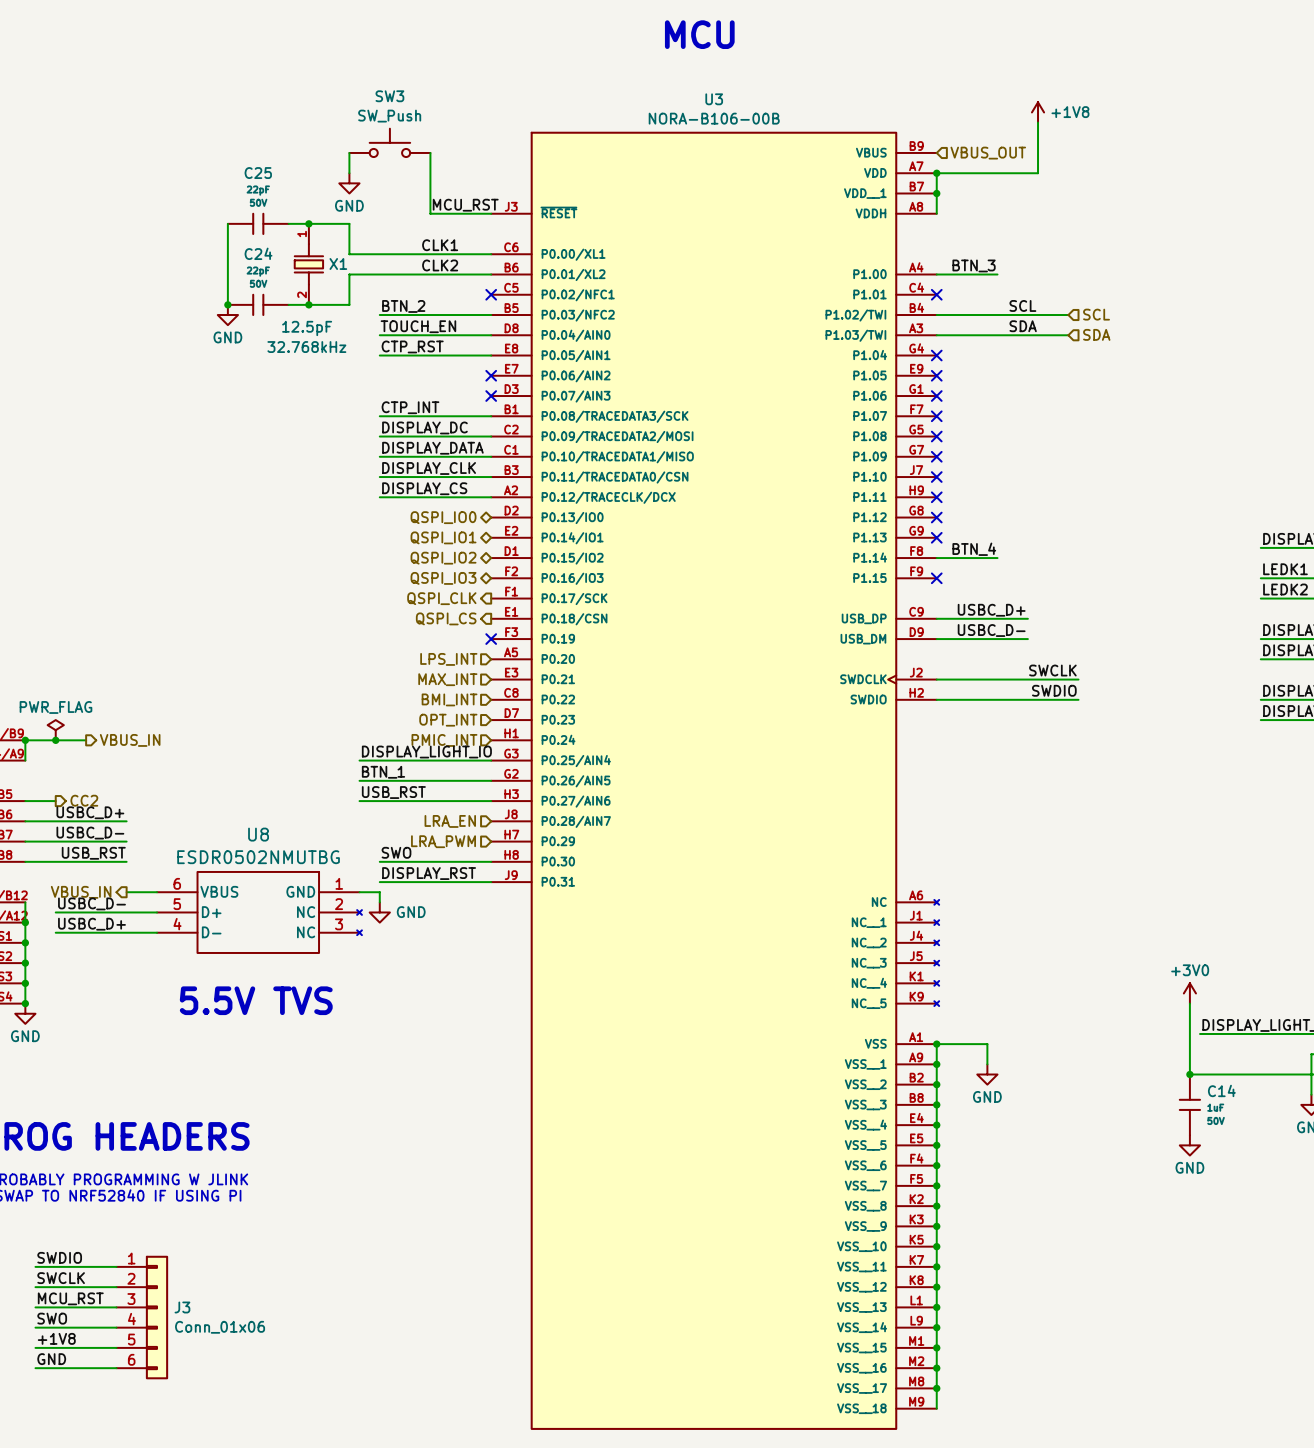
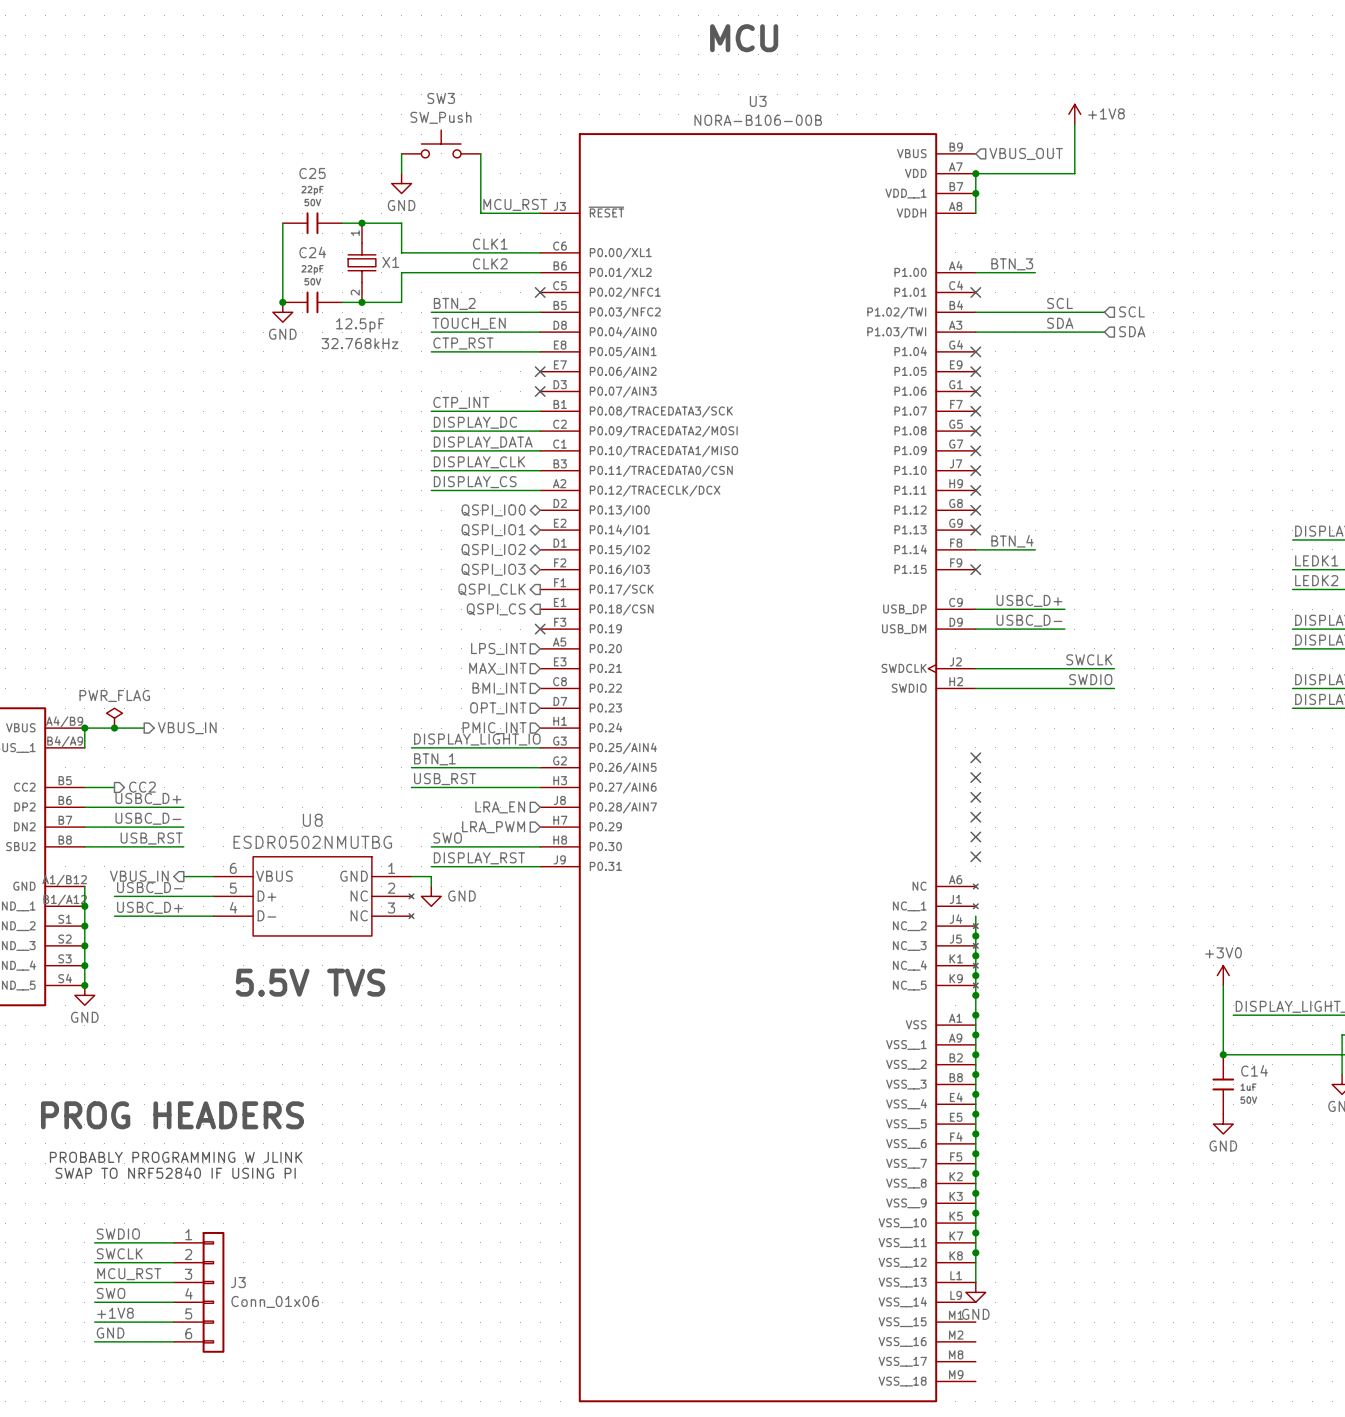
no-connect mark: none -> (975, 757)
no-connect mark: none -> (975, 777)
no-connect mark: none -> (975, 797)
no-connect mark: none -> (975, 817)
no-connect mark: none -> (975, 836)
no-connect mark: none -> (975, 856)
junction: none -> (975, 935)
junction: none -> (975, 955)
junction: none -> (975, 975)
junction: none -> (975, 995)
junction: none -> (975, 1015)
wire: (936, 1044) (987, 1044) (987, 1064) -> (975, 1025) (975, 916)
junction: (936, 1044) -> none
junction: none -> (975, 1034)
junction: (936, 1064) -> none
junction: none -> (975, 1054)
power symbol: GND (987, 1074) -> none
junction: (936, 1084) -> none
junction: none -> (975, 1074)
junction: (936, 1104) -> none
junction: none -> (975, 1094)
junction: (936, 1125) -> none
junction: none -> (975, 1114)
junction: (936, 1145) -> none
junction: none -> (975, 1133)
junction: (936, 1165) -> none
junction: none -> (975, 1153)
junction: (936, 1185) -> none
junction: none -> (975, 1173)
junction: (936, 1206) -> none
junction: none -> (975, 1193)
junction: (936, 1226) -> none
junction: none -> (975, 1213)
junction: (936, 1246) -> none
junction: none -> (975, 1232)
junction: (936, 1266) -> none
junction: none -> (975, 1252)
junction: (936, 1287) -> none
wire: (936, 1307) (936, 1408) -> none
junction: (936, 1307) -> none
power symbol: none -> GND (975, 1292)
junction: (936, 1327) -> none
junction: (936, 1347) -> none
junction: (936, 1368) -> none
junction: (936, 1388) -> none

